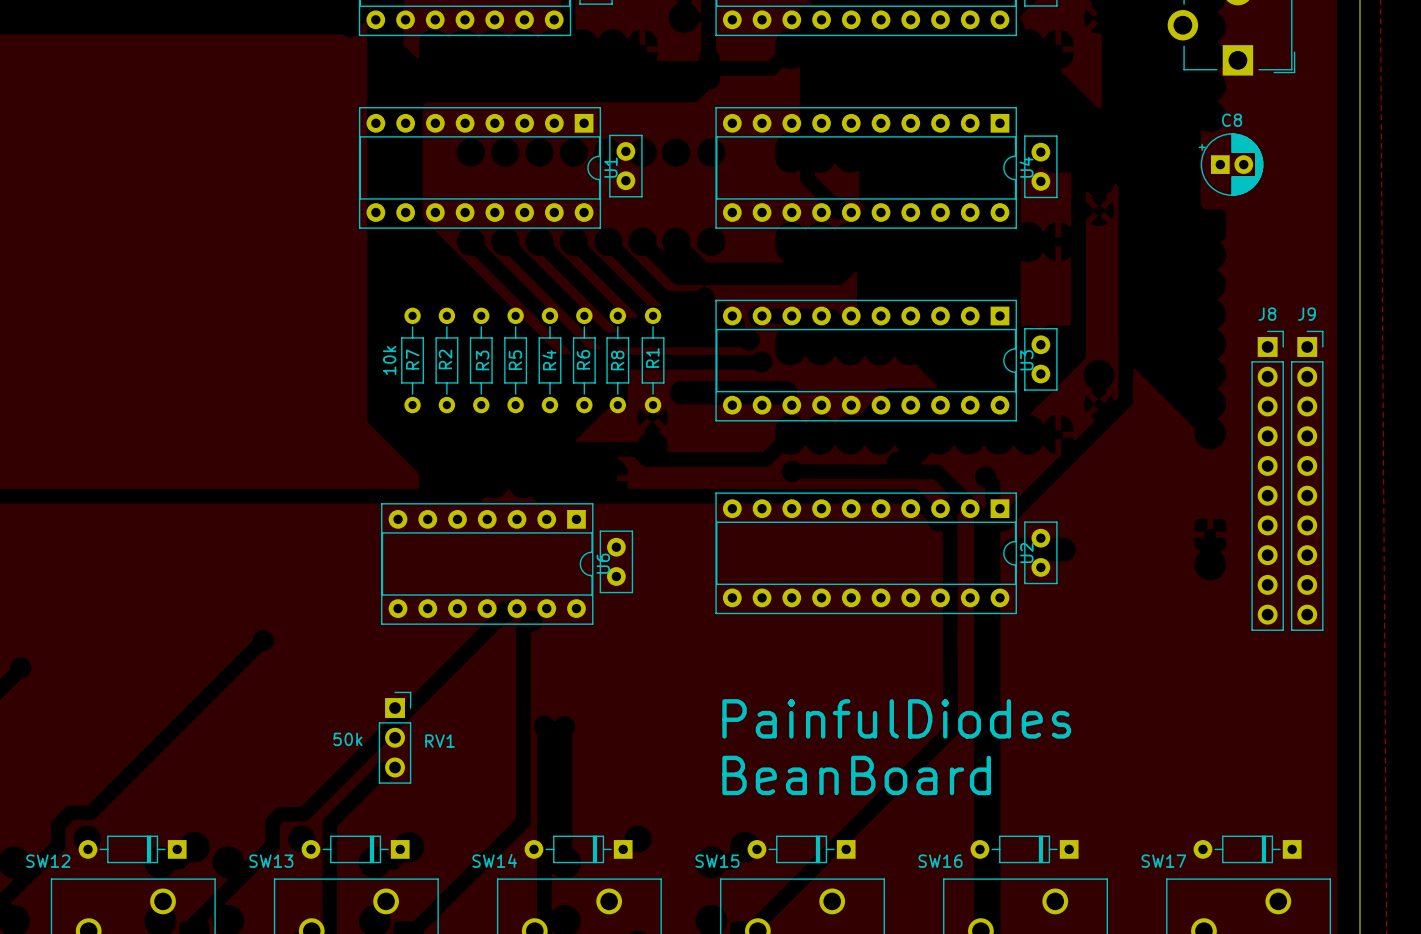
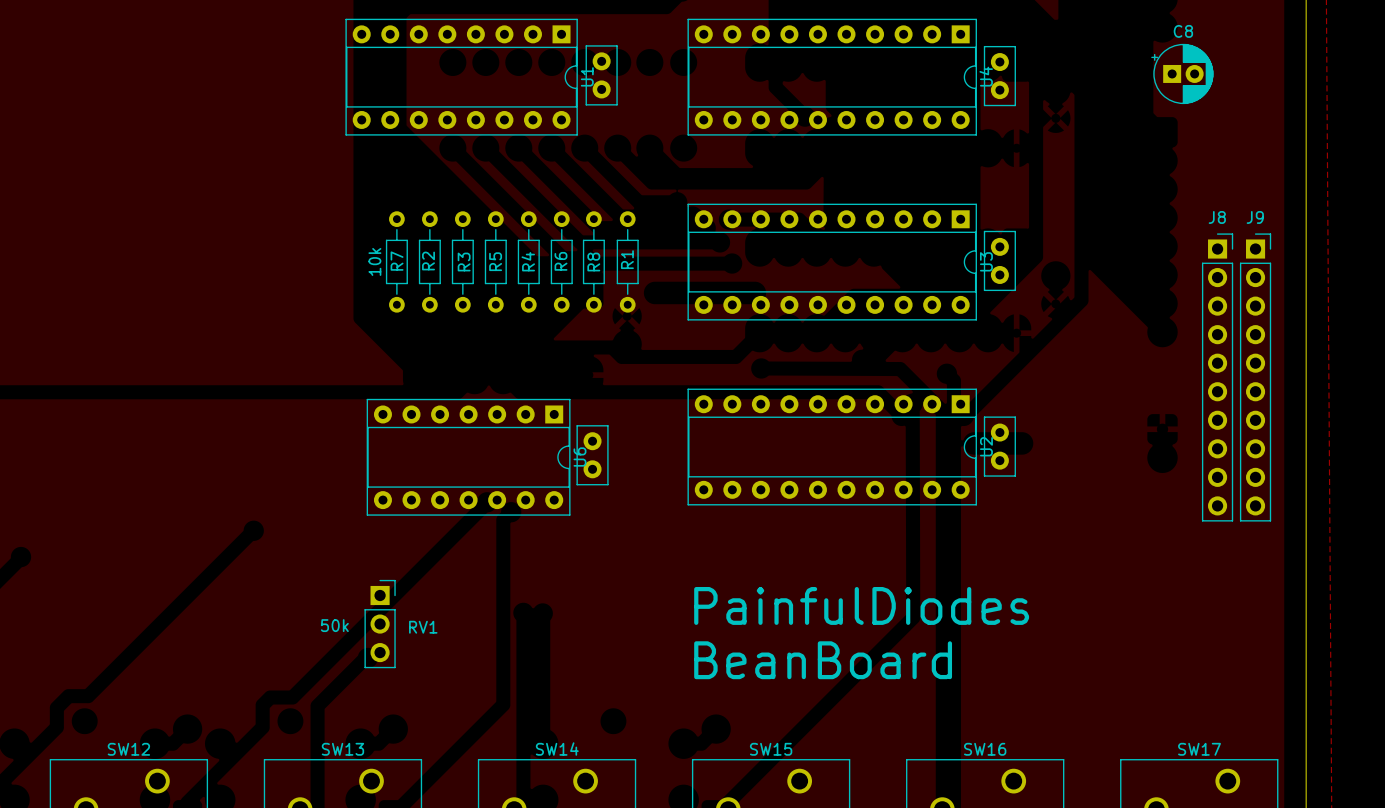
part: (132, 849) -> none
part: (355, 849) -> none
part: (578, 849) -> none
part: (801, 849) -> none
part: (1024, 849) -> none
part: (1247, 849) -> none
SW14 name position: SW14 (494, 860) -> SW14 (557, 749)
SW12 name position: SW12 (48, 861) -> SW12 (128, 749)
SW13 name position: SW13 (271, 861) -> SW13 (342, 749)
SW15 name position: SW15 (717, 861) -> SW15 (771, 749)
SW16 name position: SW16 (940, 861) -> SW16 (985, 749)
SW17 name position: SW17 (1163, 861) -> SW17 (1199, 749)

